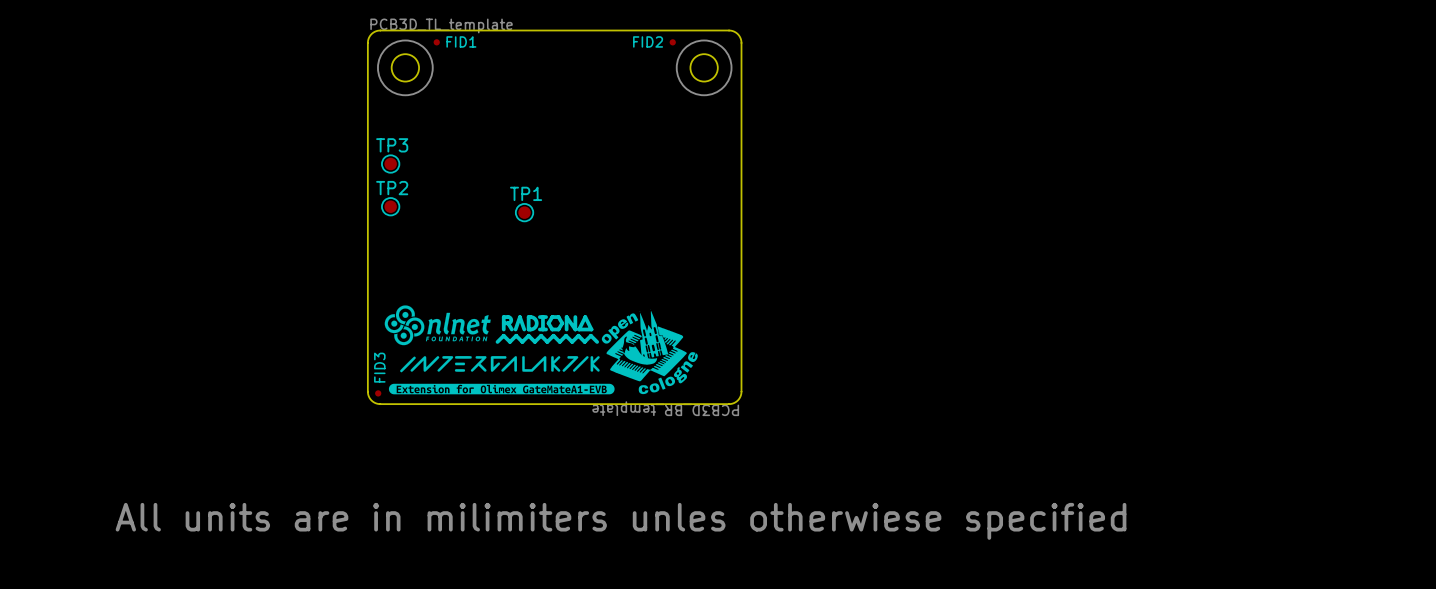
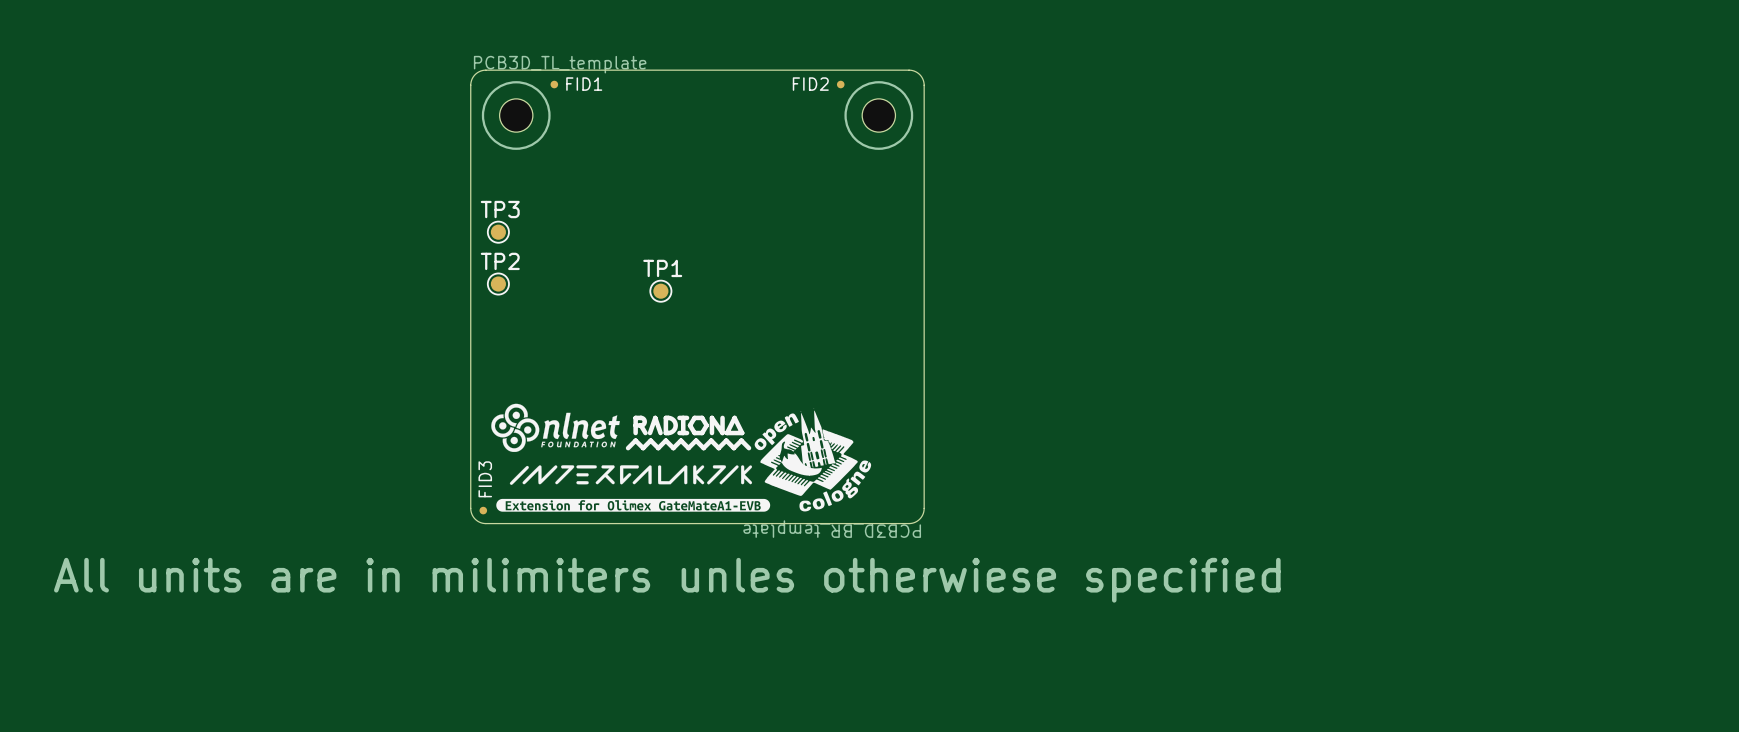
text position: All units are in milimiters unles otherwiese specified (621, 521) -> All units are in milimiters unles otherwiese specified (667, 580)

